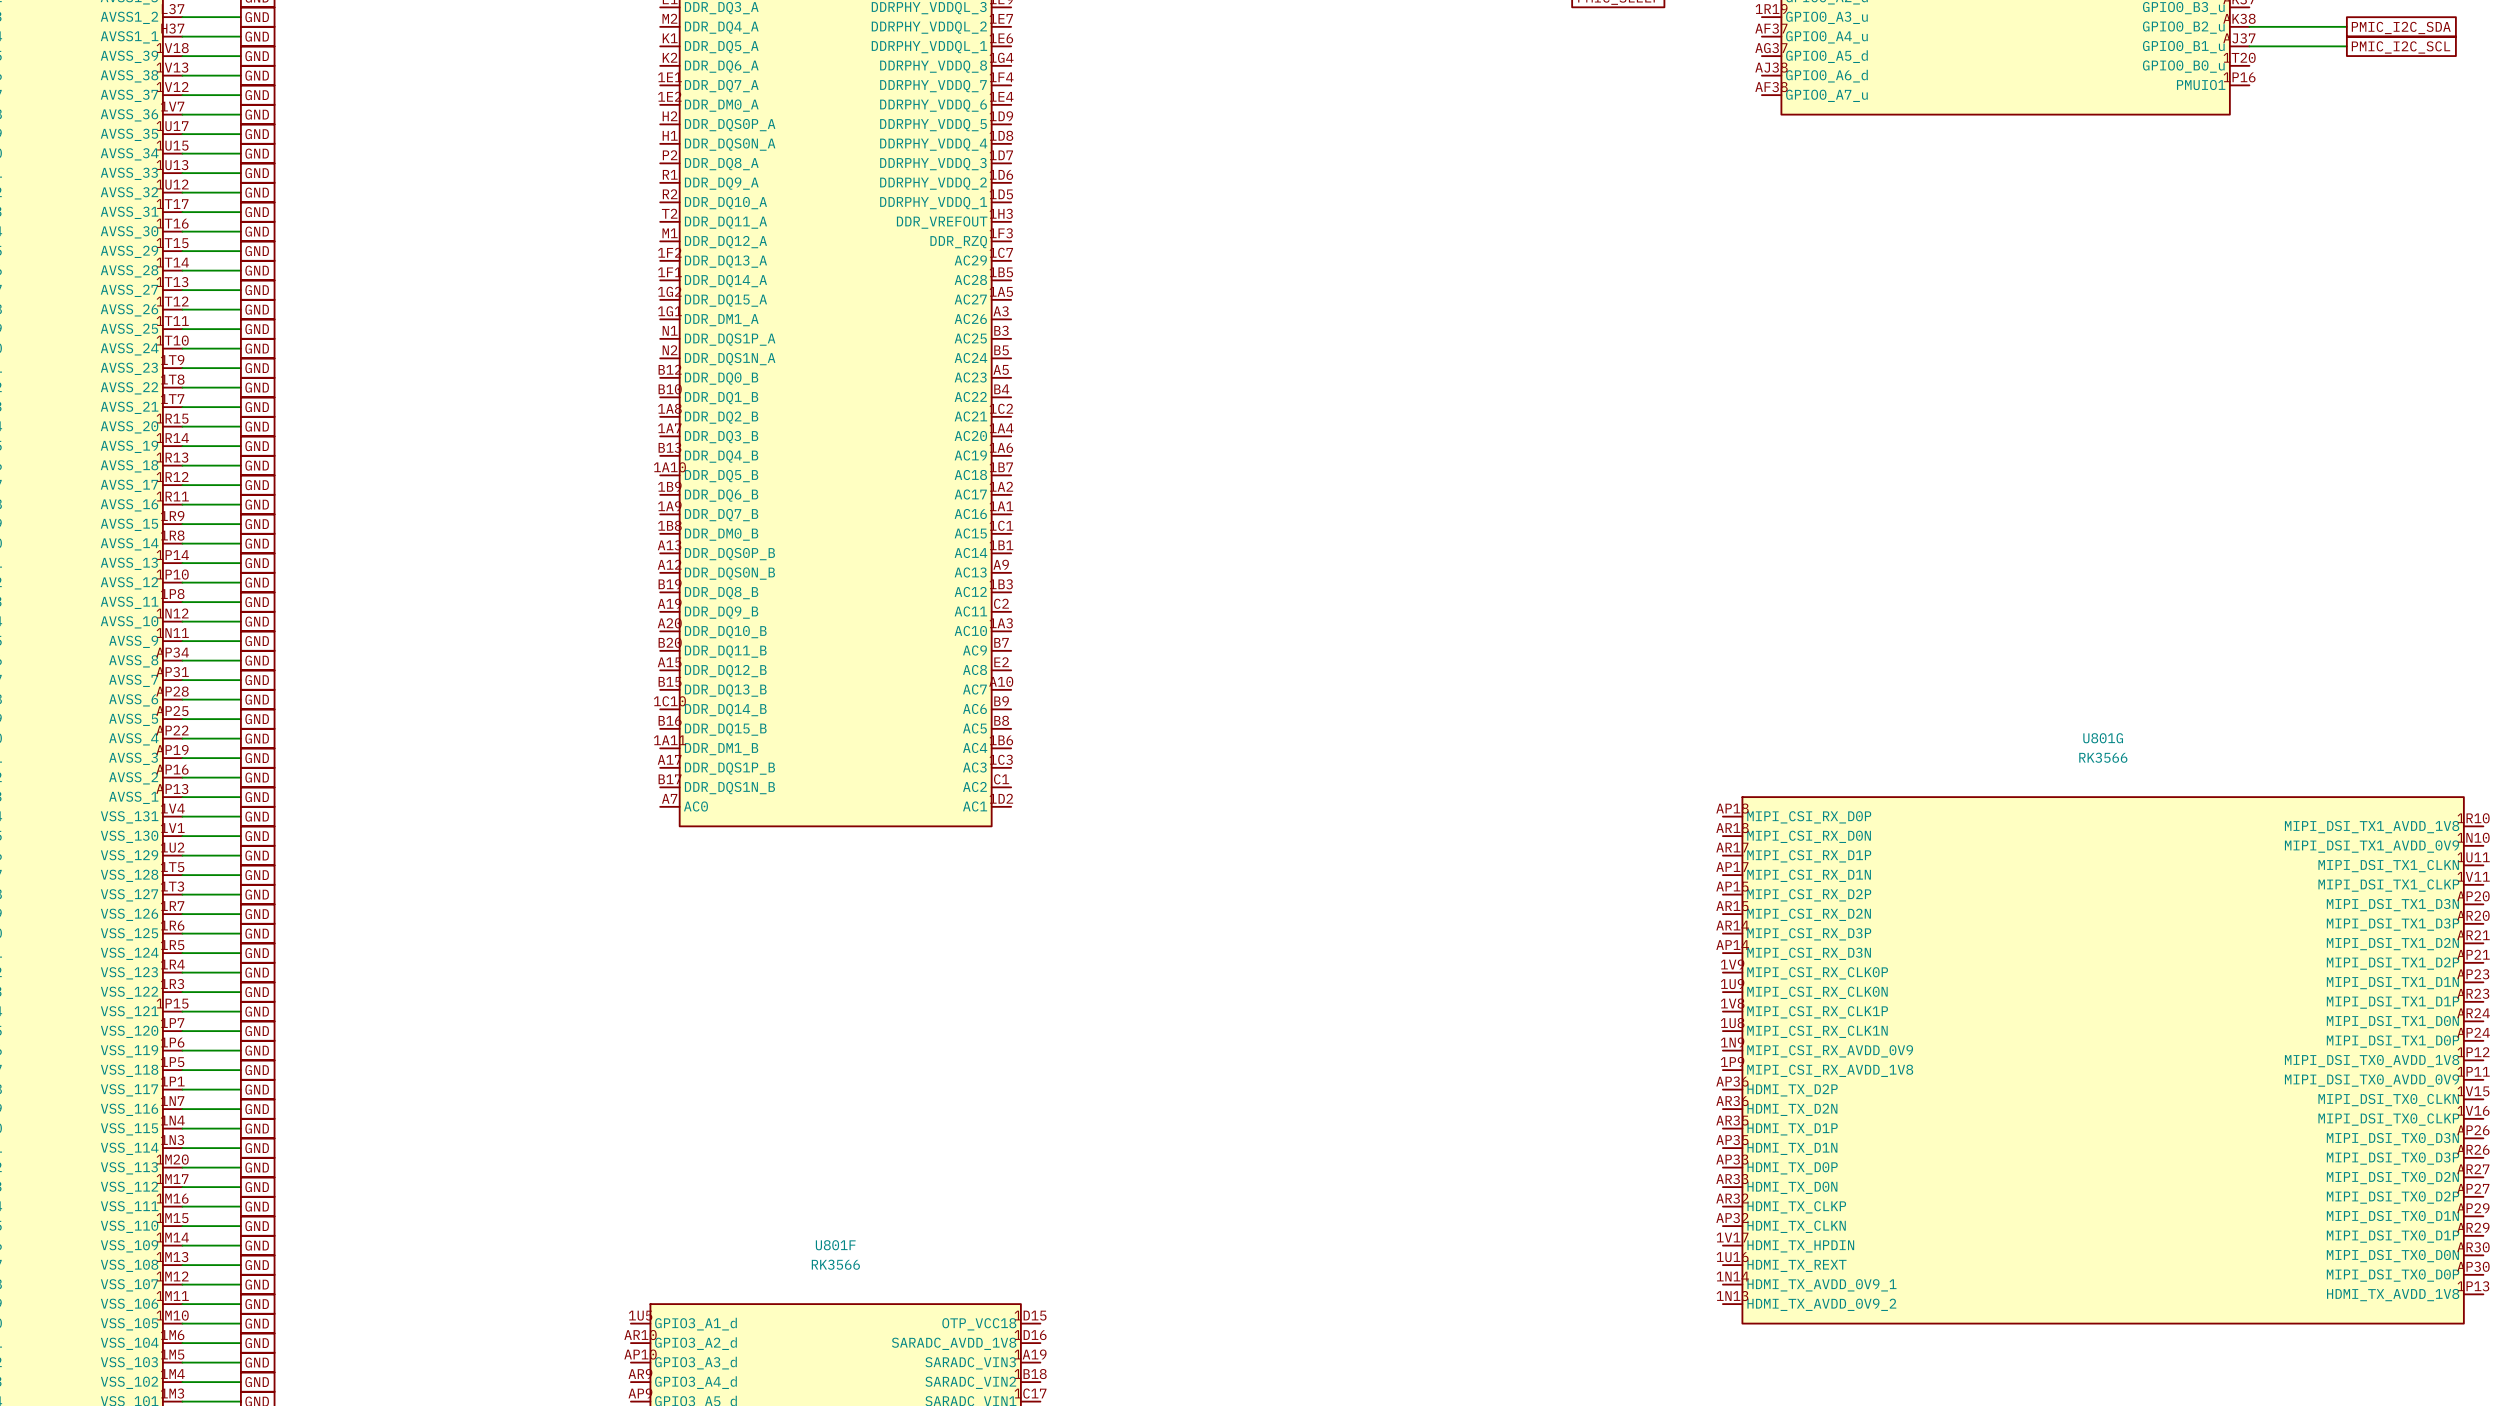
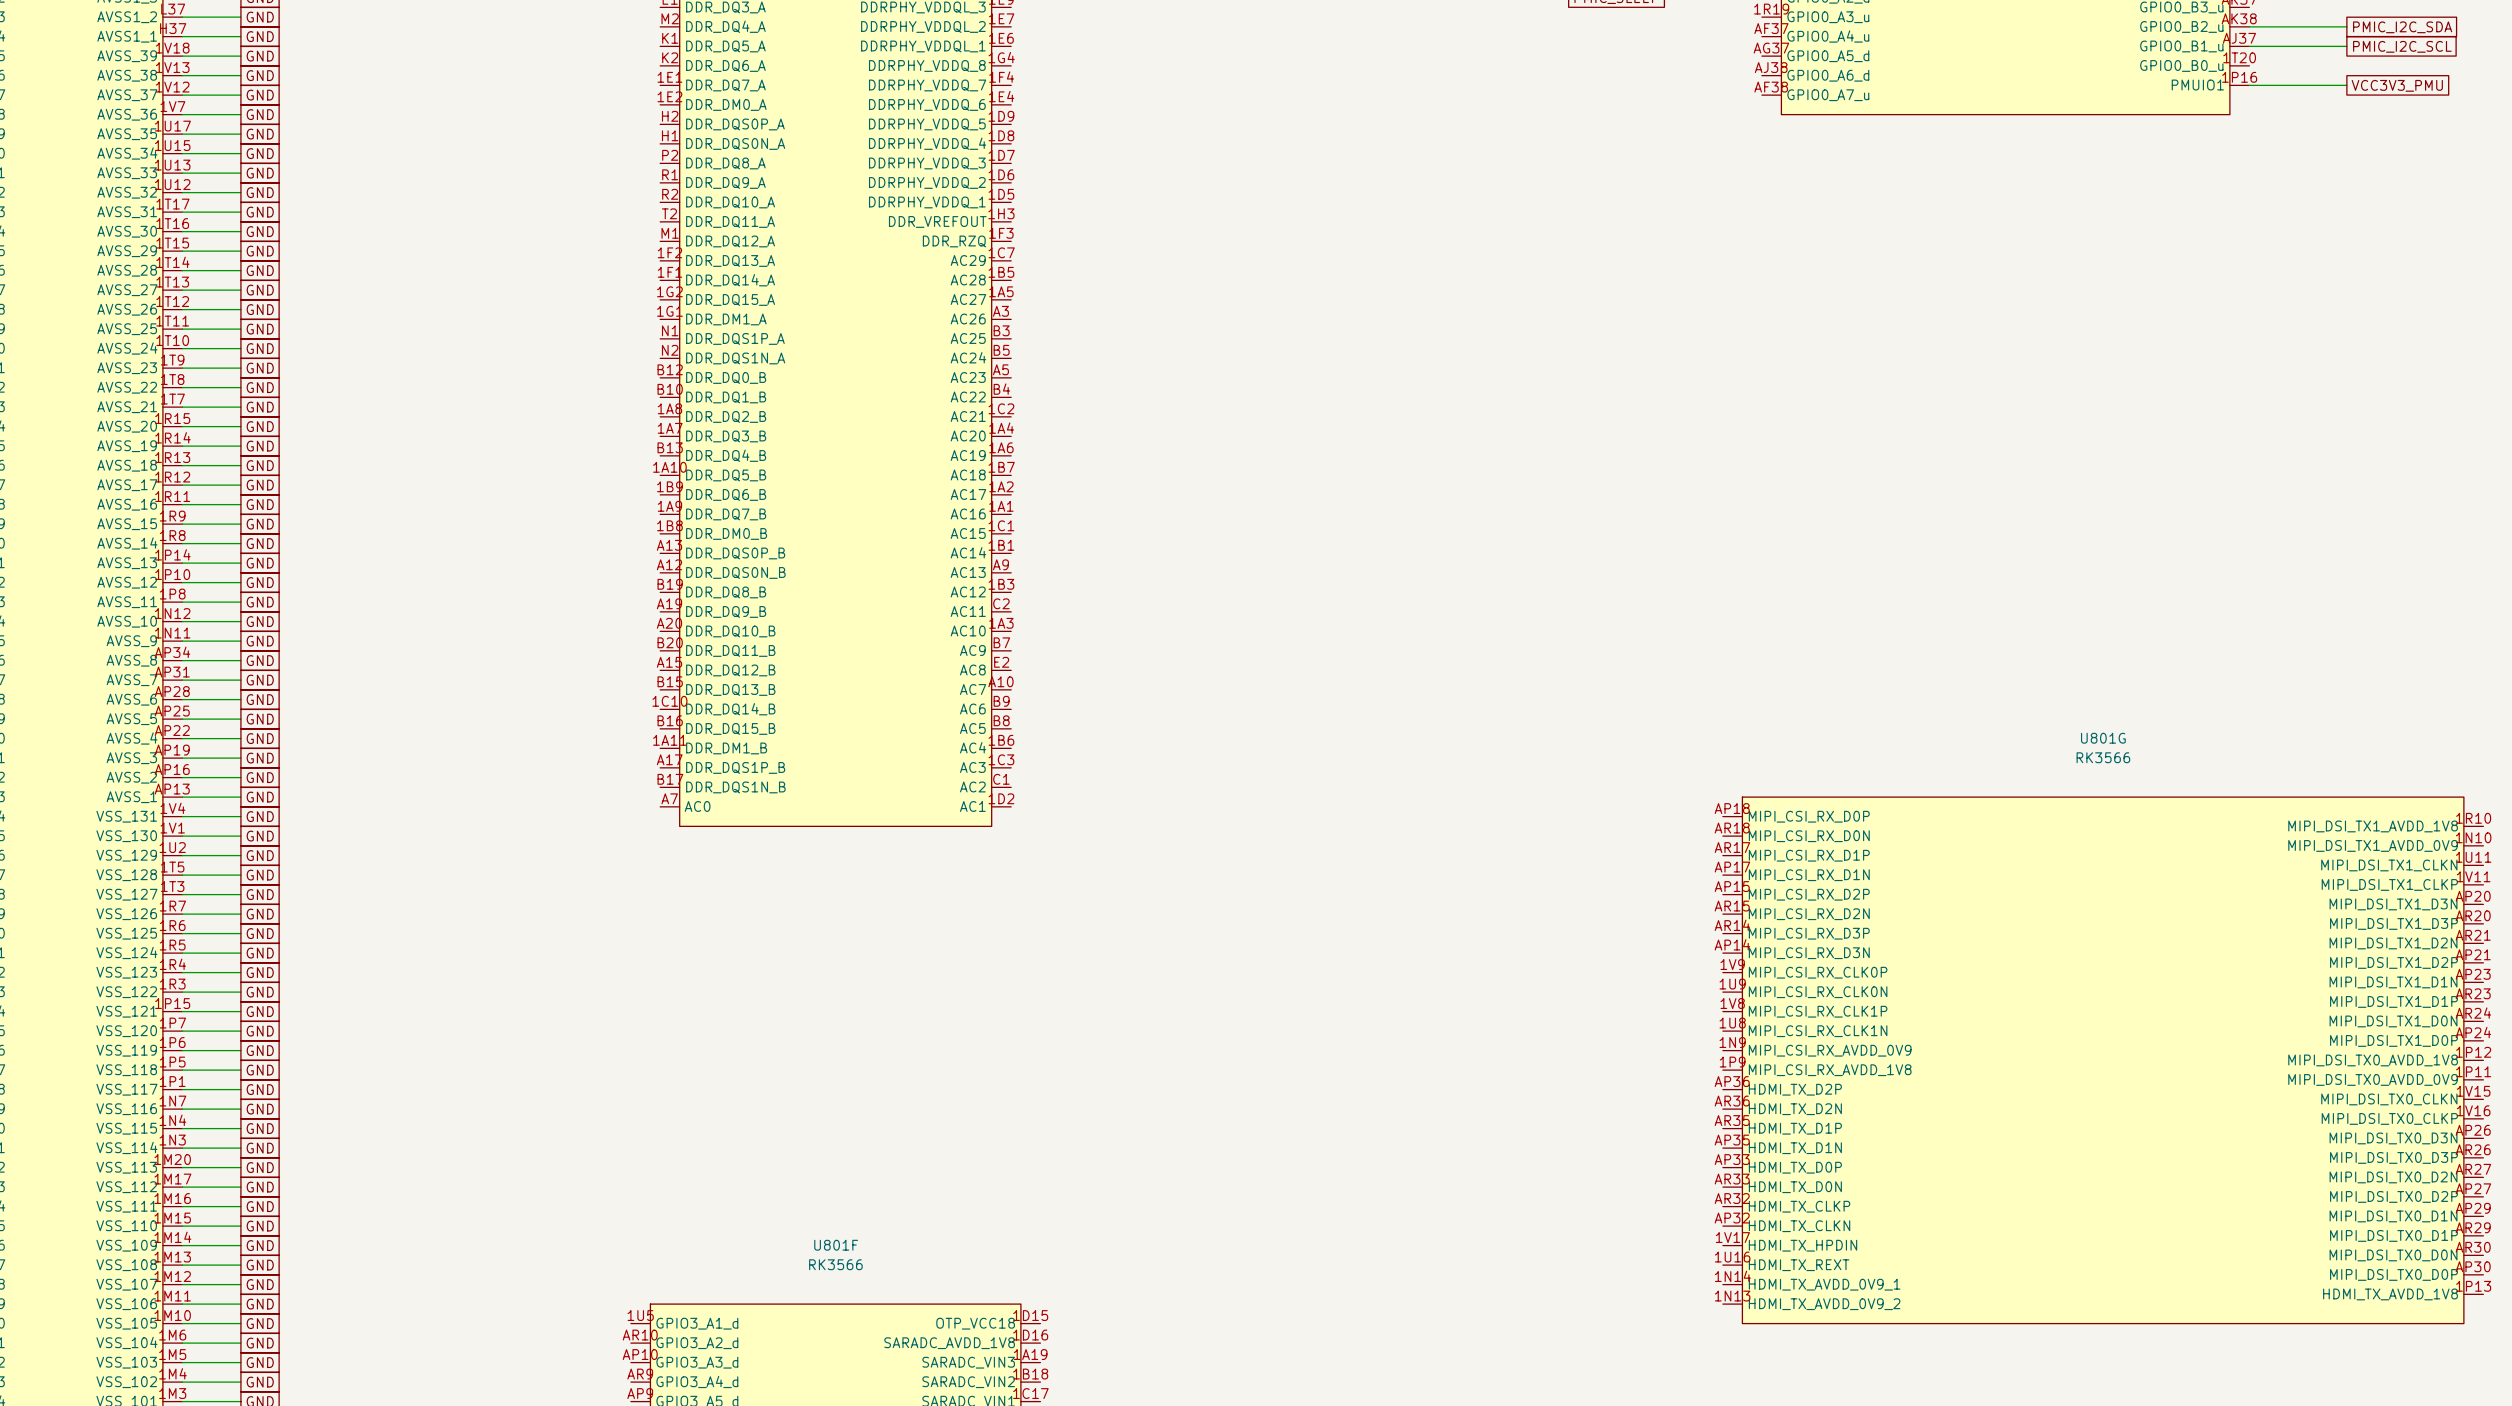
wire: none -> (2249, 85) (2346, 85)
global label: none -> VCC3V3_PMU (2397, 85)

